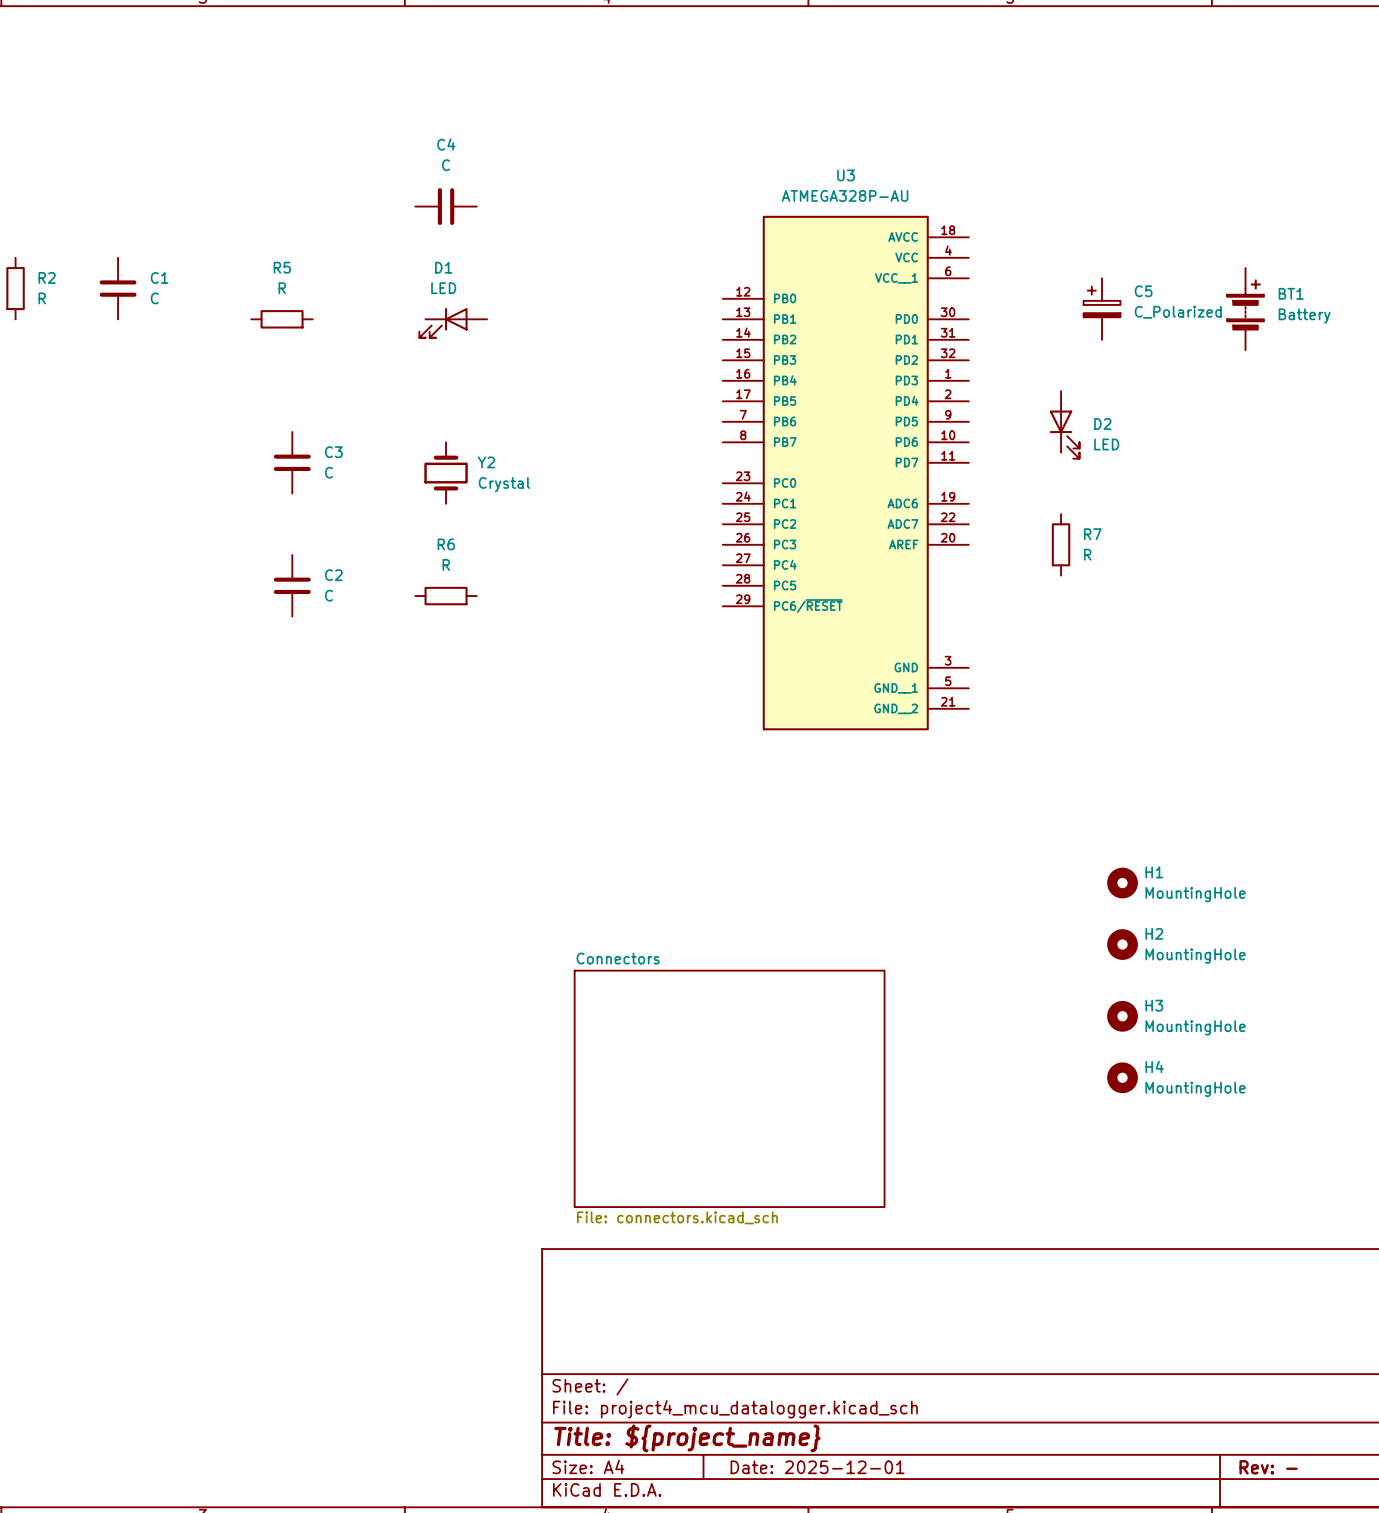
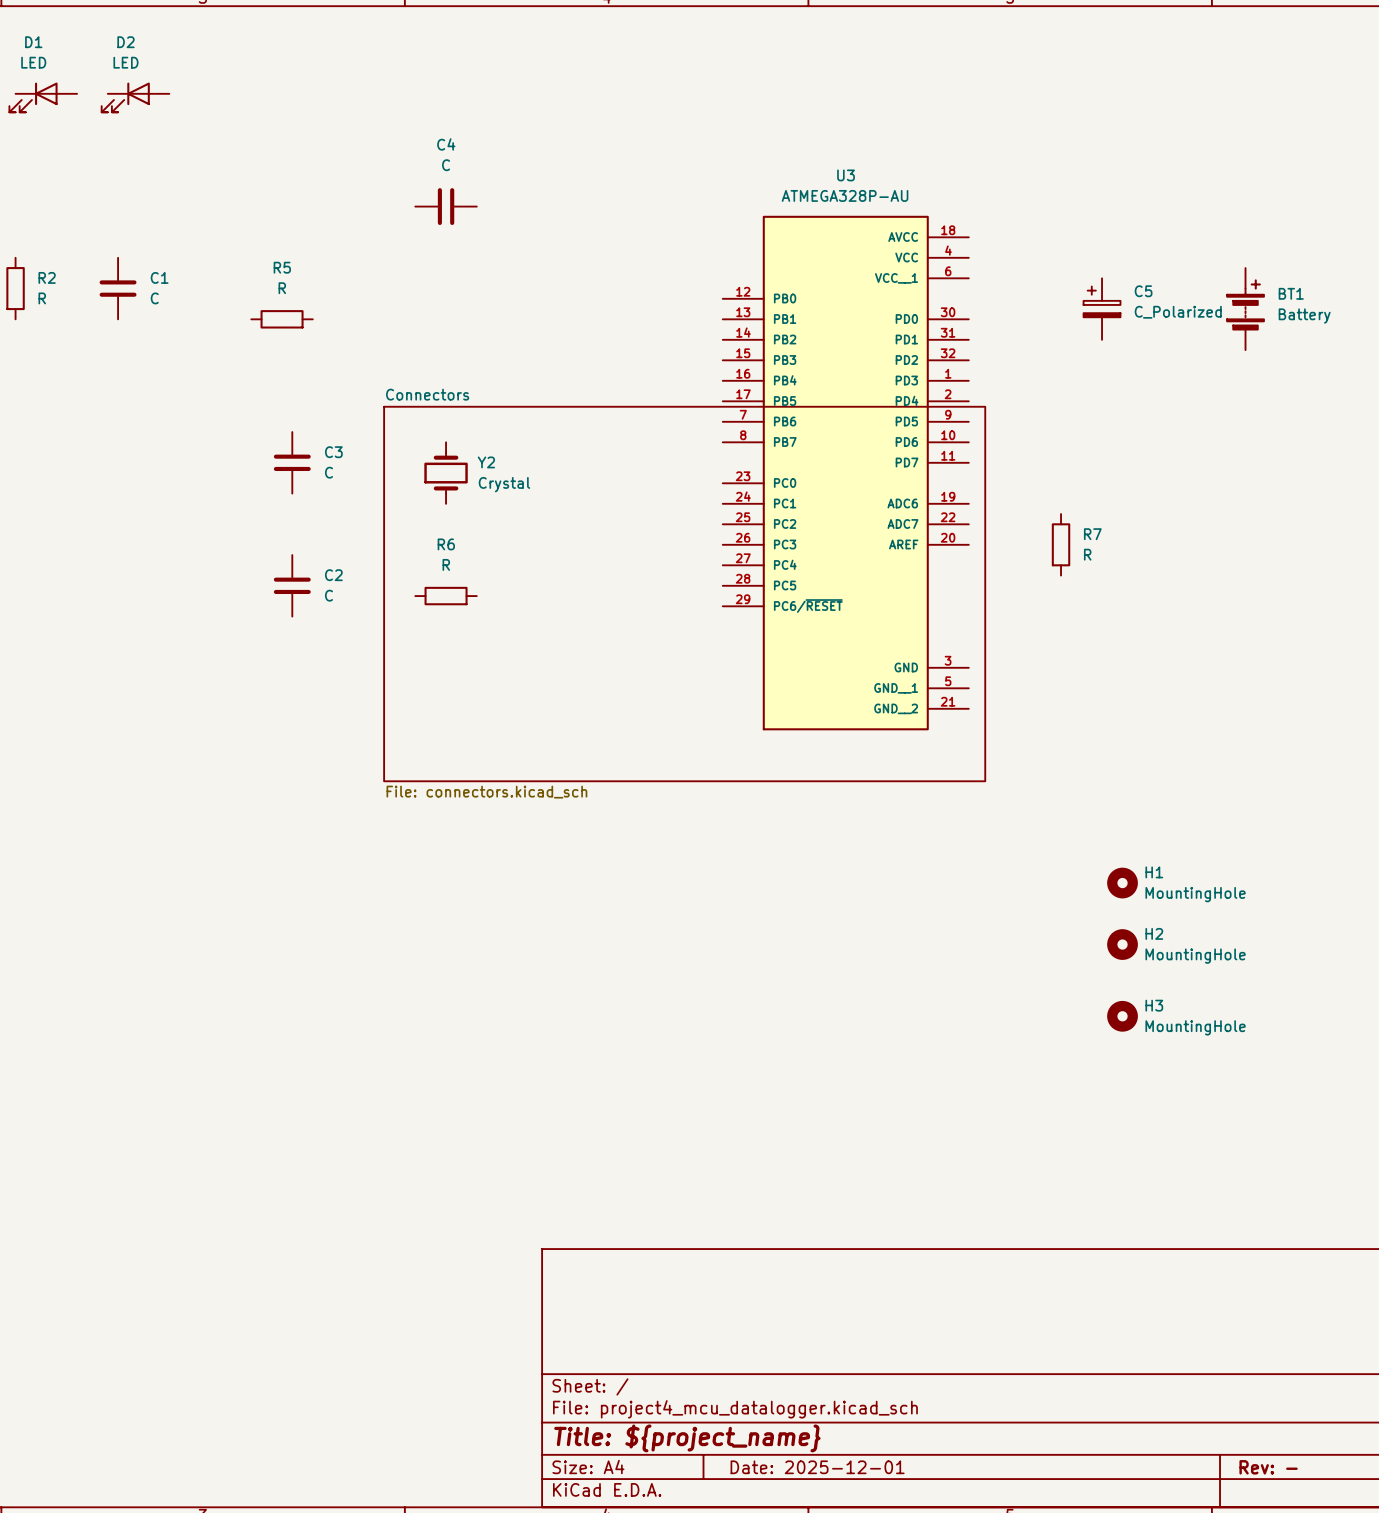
D1 position: (453, 322) -> (43, 97)
D2 name position: D2 (1102, 423) -> D2 (125, 42)
D2 position: (1064, 424) -> (135, 97)
D2 rotation: 0° (1064, 434) -> 90° clockwise (125, 97)
D2 value position: LED (1106, 444) -> LED (125, 62)
sheet Connectors: none -> File: connectors.kicad_sch (684, 594)
H4: MountingHole (1122, 1077) -> none
sheet Connectors: File: connectors.kicad_sch (729, 1088) -> none

